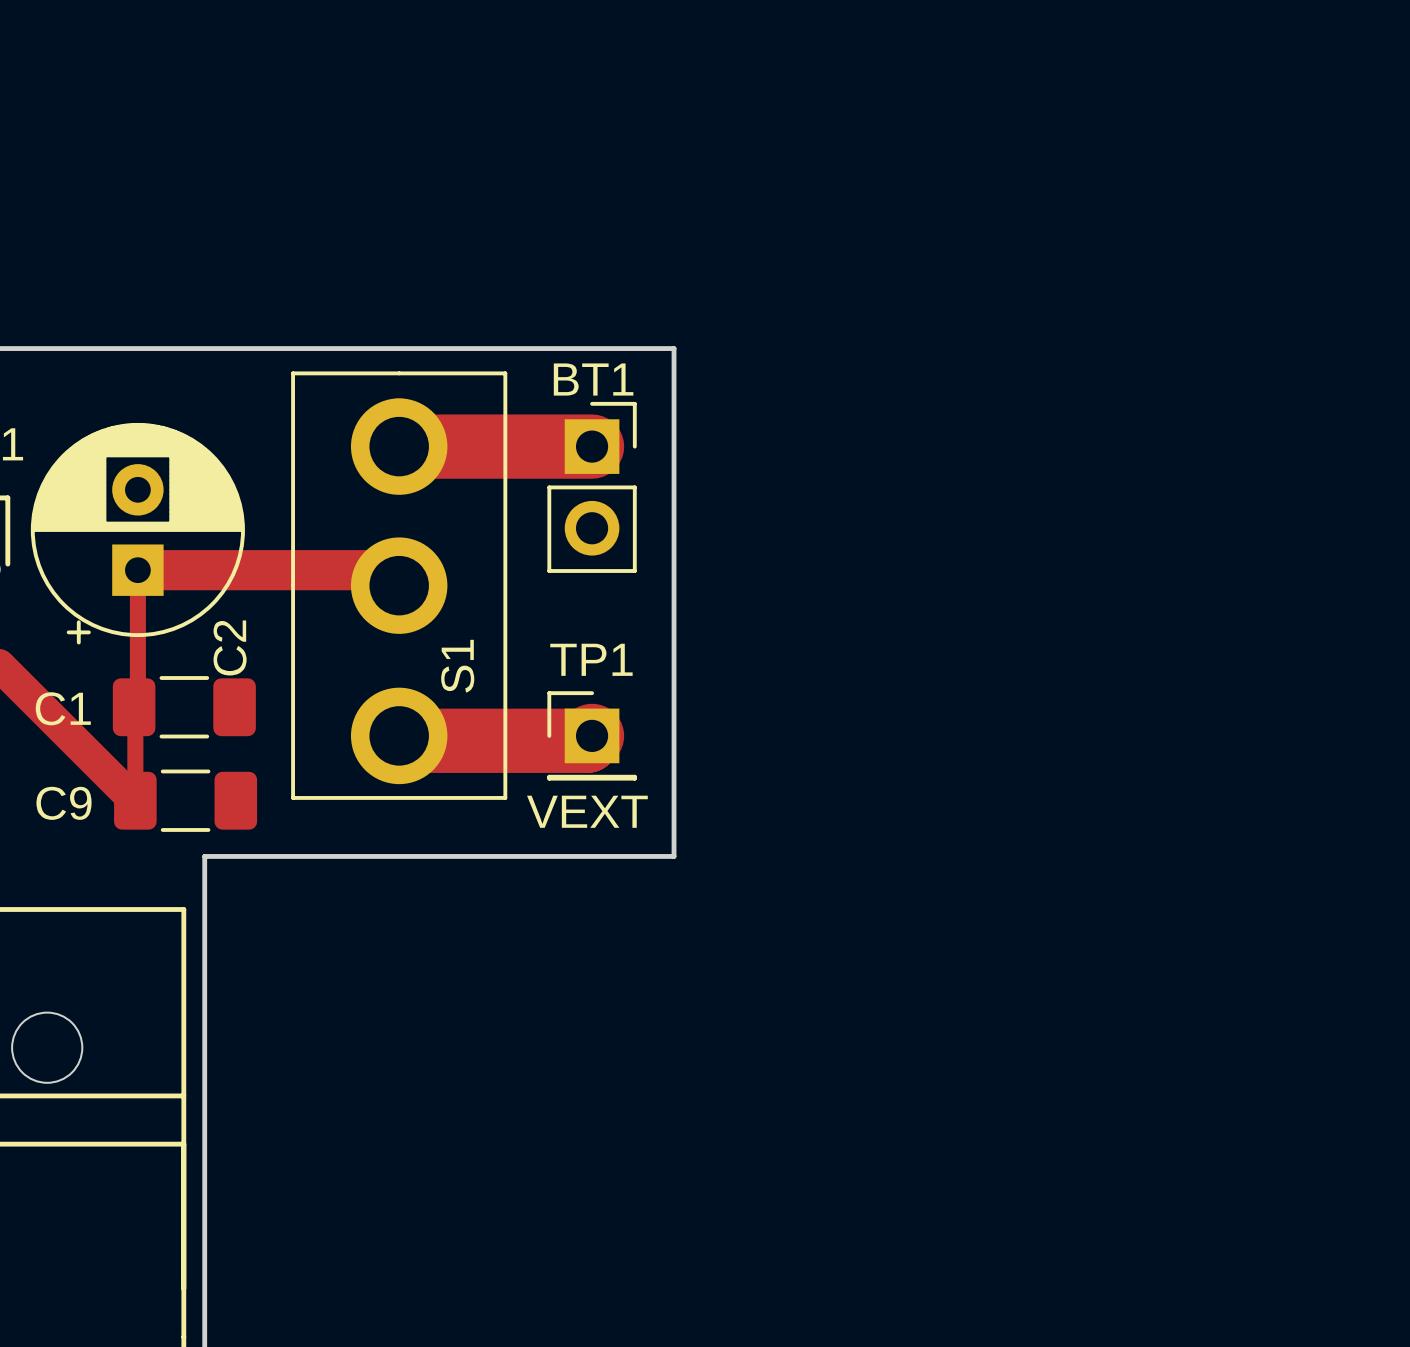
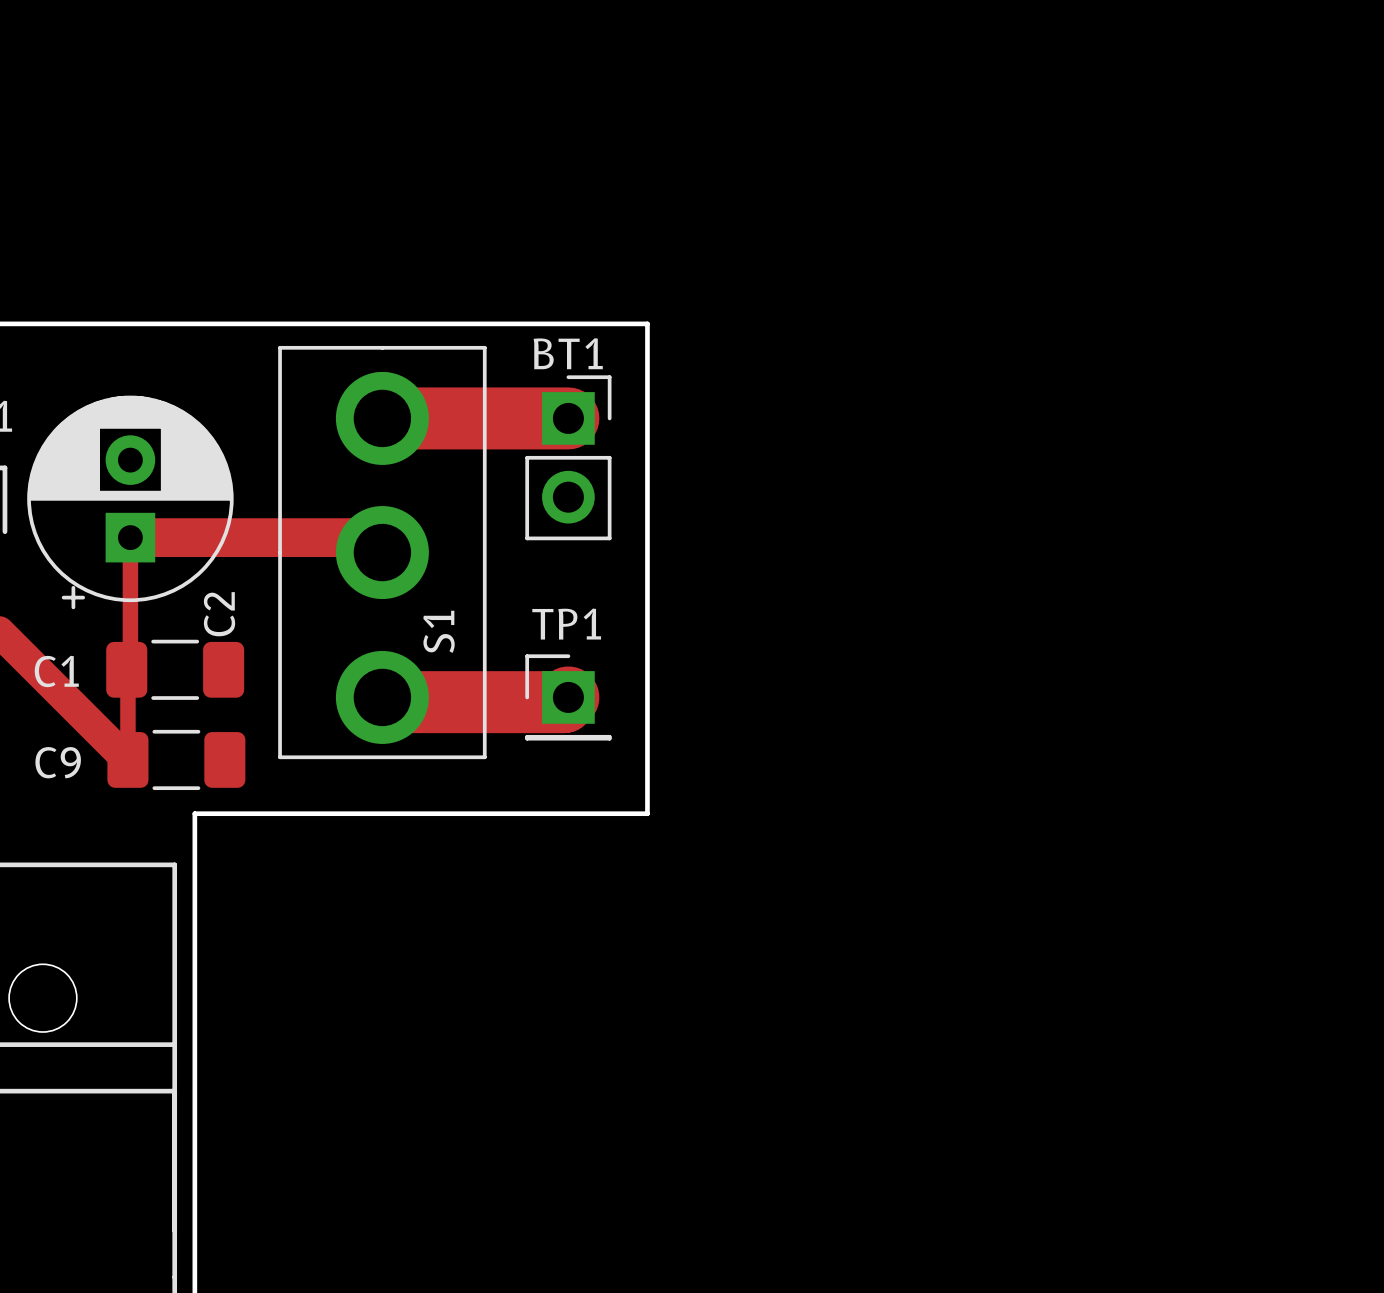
text: VEXT (587, 811) -> none

